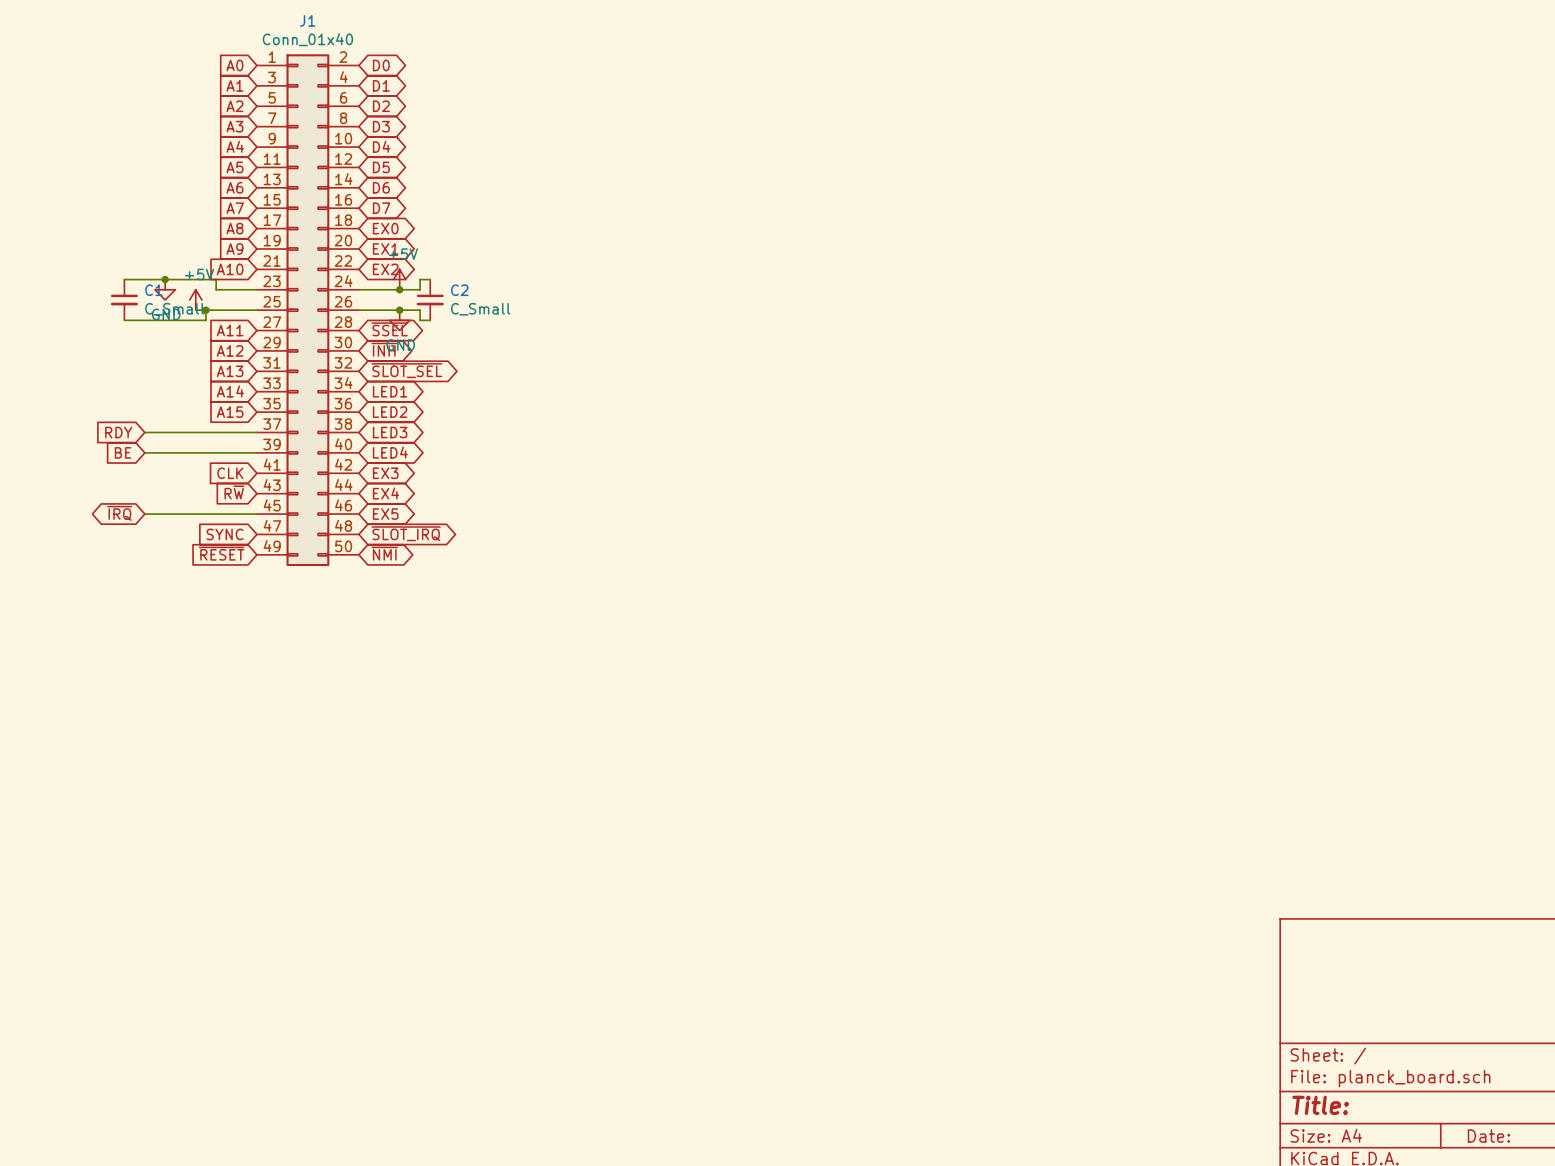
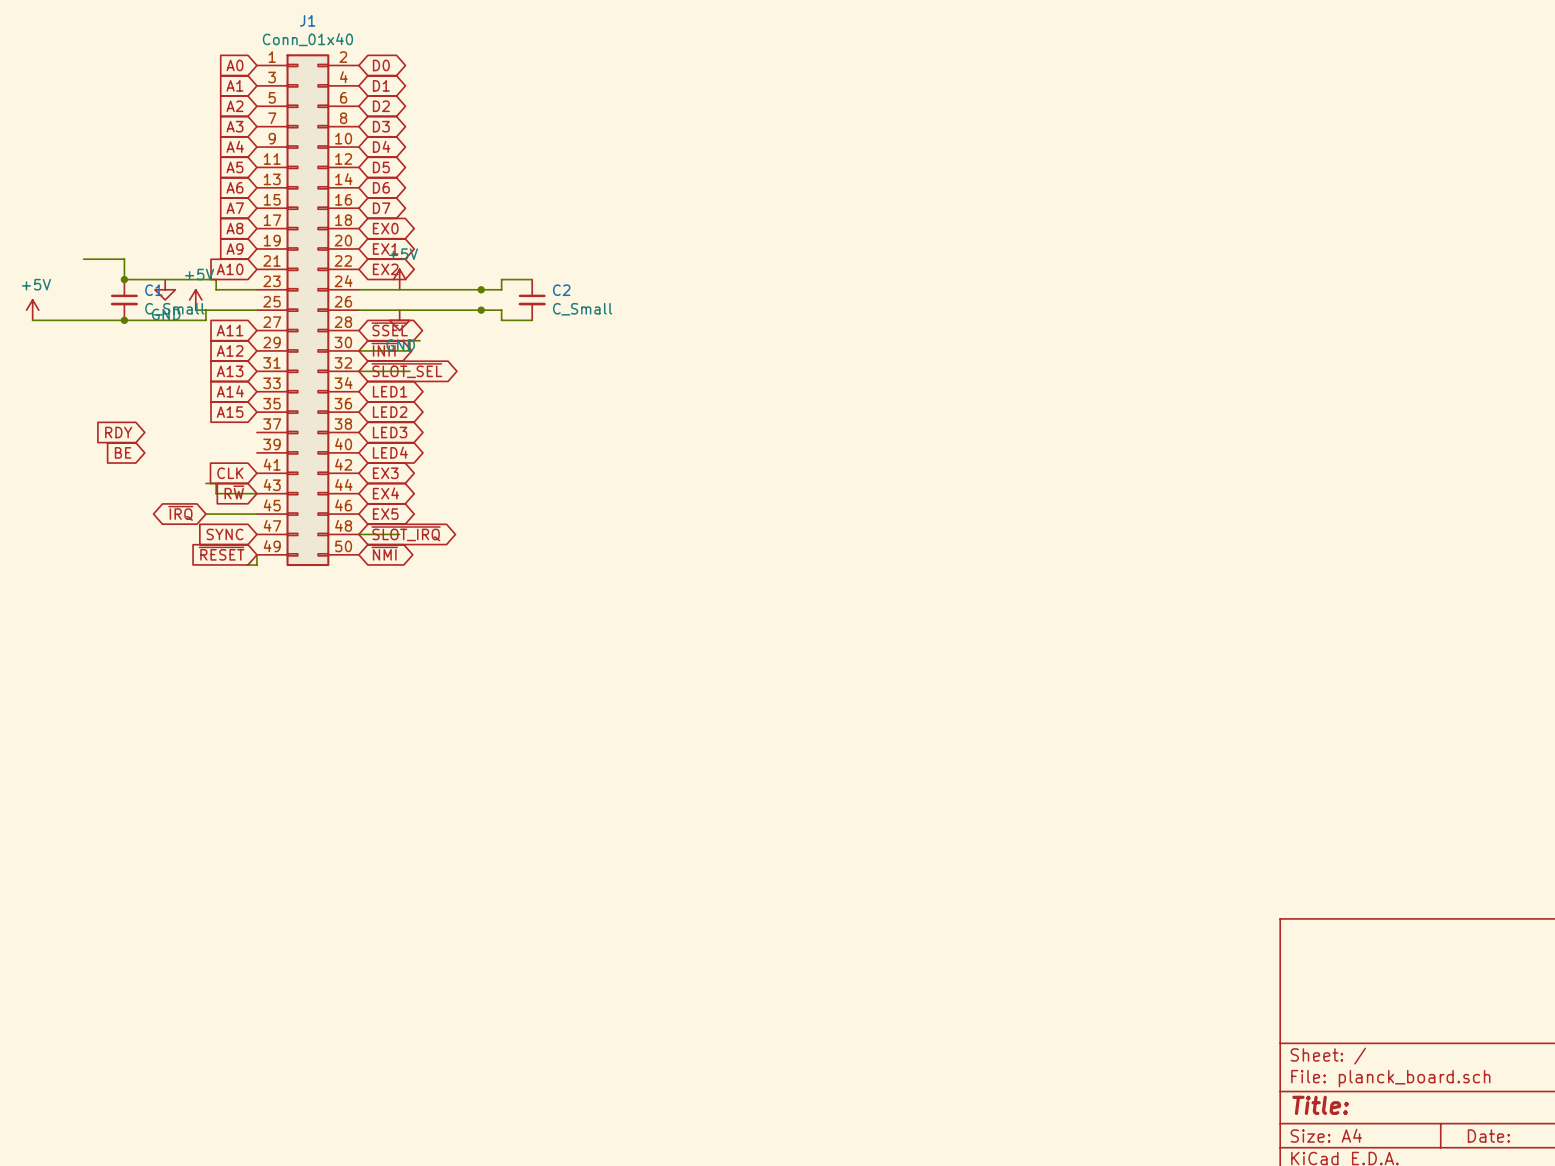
wire: none -> (83, 259) (124, 259) (124, 279)
junction: none -> (124, 279)
junction: (165, 279) -> none
wire: (430, 279) (420, 279) (420, 289) -> (532, 279) (501, 279) (501, 289) (420, 289)
junction: (399, 289) -> none
junction: none -> (481, 289)
C2 position: (430, 299) -> (532, 299)
power symbol: none -> +5V (32, 310)
junction: (205, 310) -> none
junction: (399, 310) -> none
wire: (420, 310) (420, 320) (430, 320) -> (420, 310) (501, 310) (501, 320) (532, 320)
junction: none -> (481, 310)
wire: none -> (32, 320) (124, 320)
junction: none -> (124, 320)
wire: none -> (420, 340) (409, 340) (409, 350) (358, 350)
wire: none -> (358, 371) (409, 371)
wire: (144, 432) (256, 432) -> none
wire: (144, 452) (256, 452) -> none
wire: none -> (205, 483) (216, 483) (216, 493) (256, 493)
global label position: ~{IRQ} (119, 513) -> ~{IRQ} (180, 513)
wire: (144, 514) (205, 514) -> none
wire: none -> (358, 534) (399, 534)
wire: none -> (256, 554) (256, 565) (246, 565)

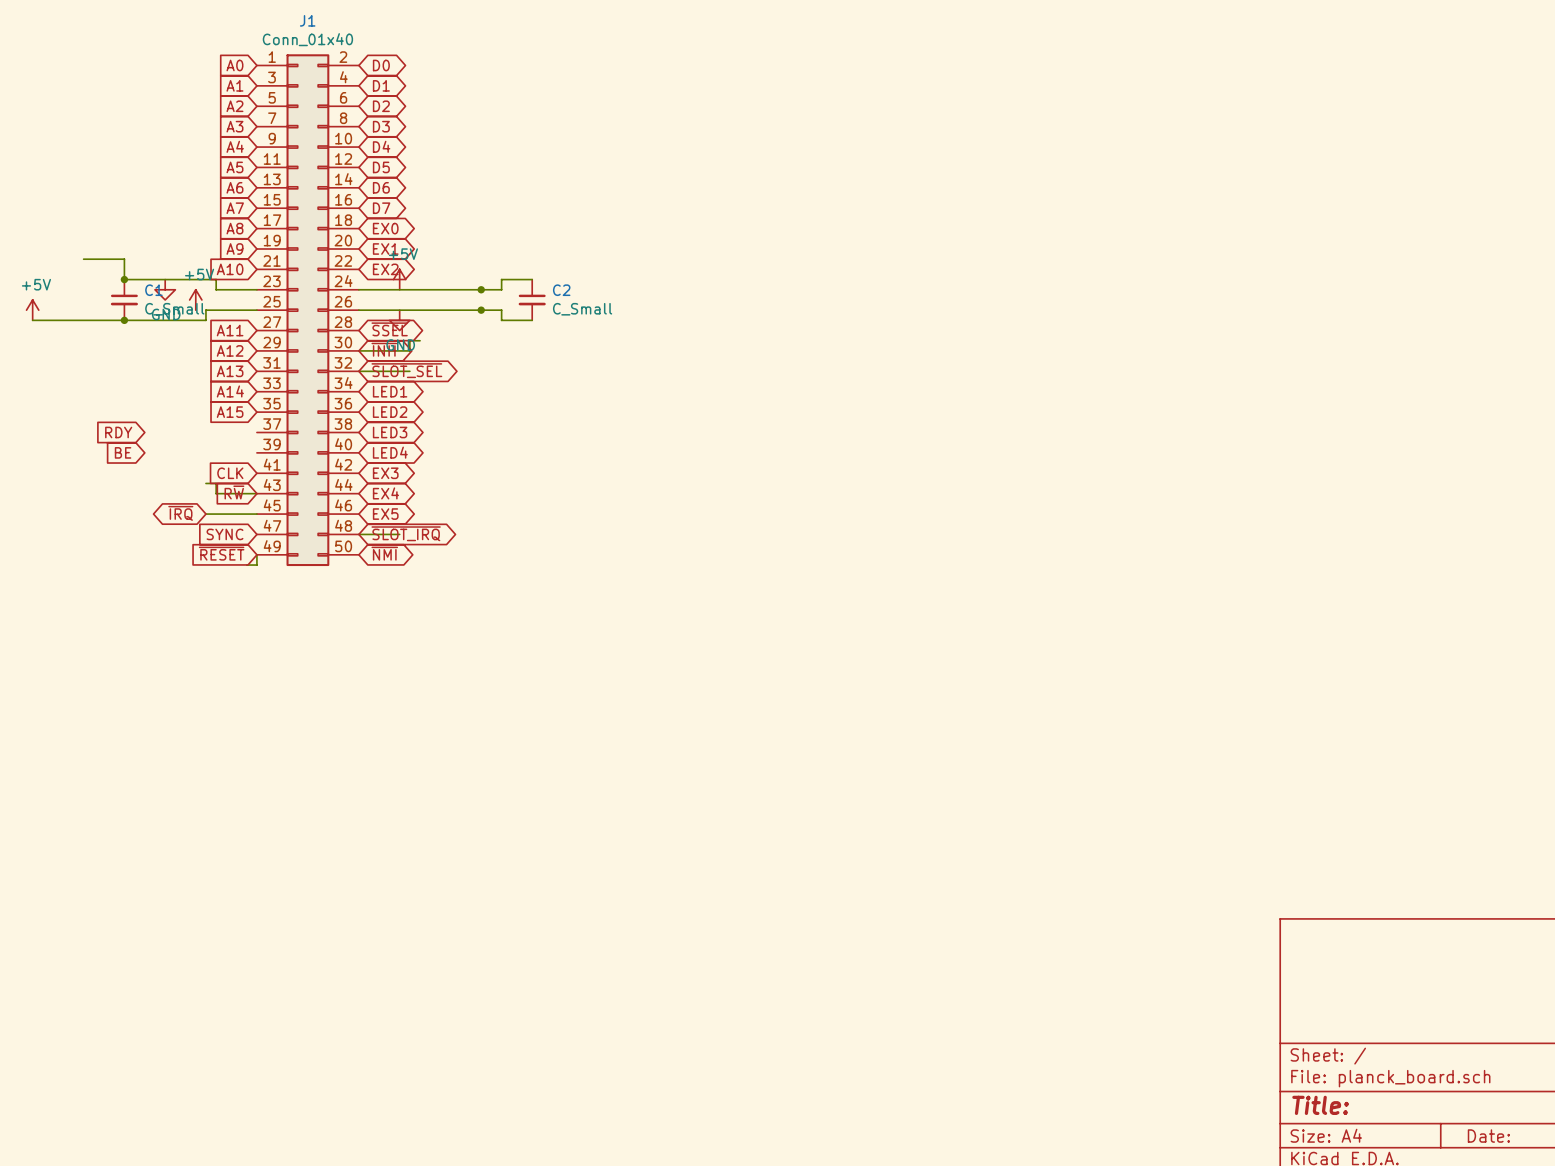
wire: (195, 310) (205, 310) -> none

